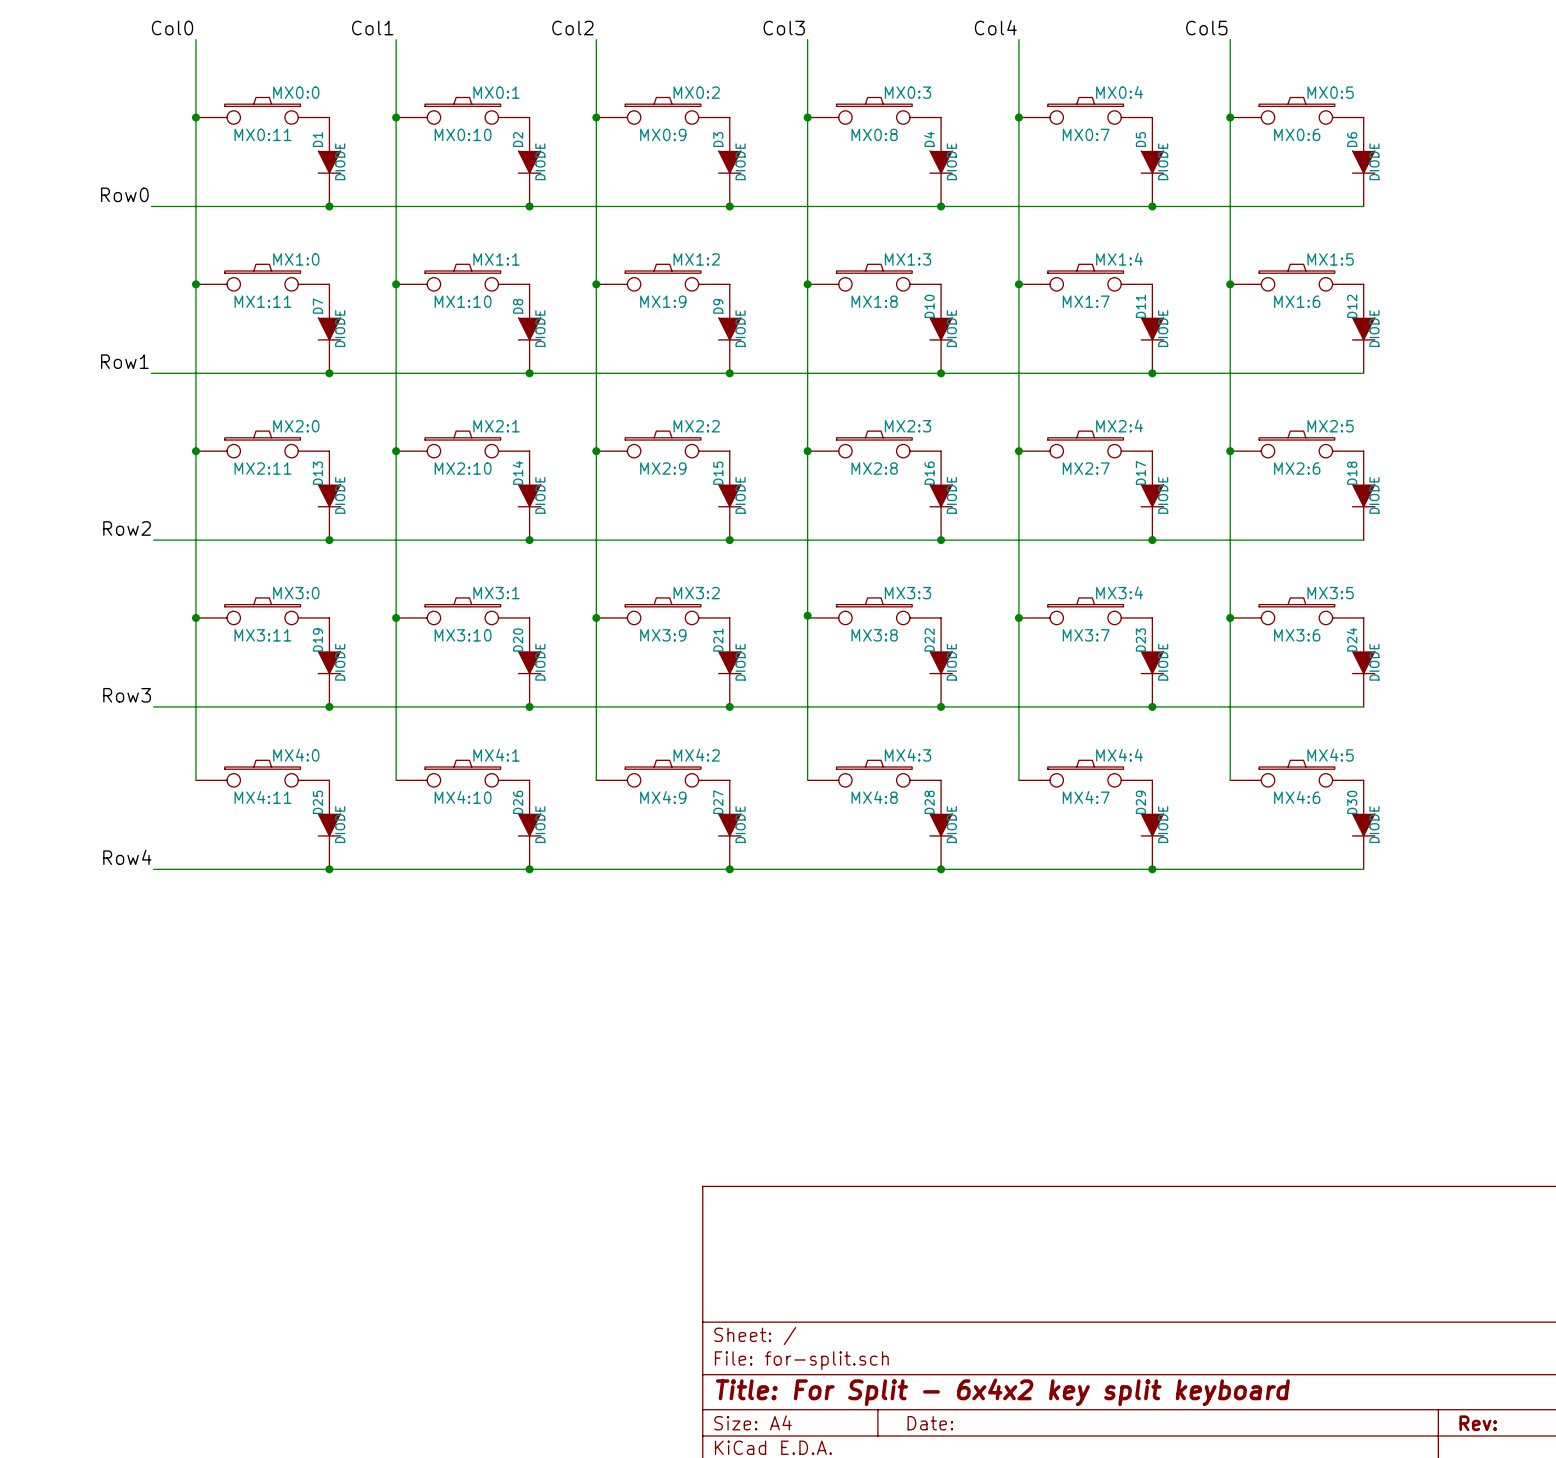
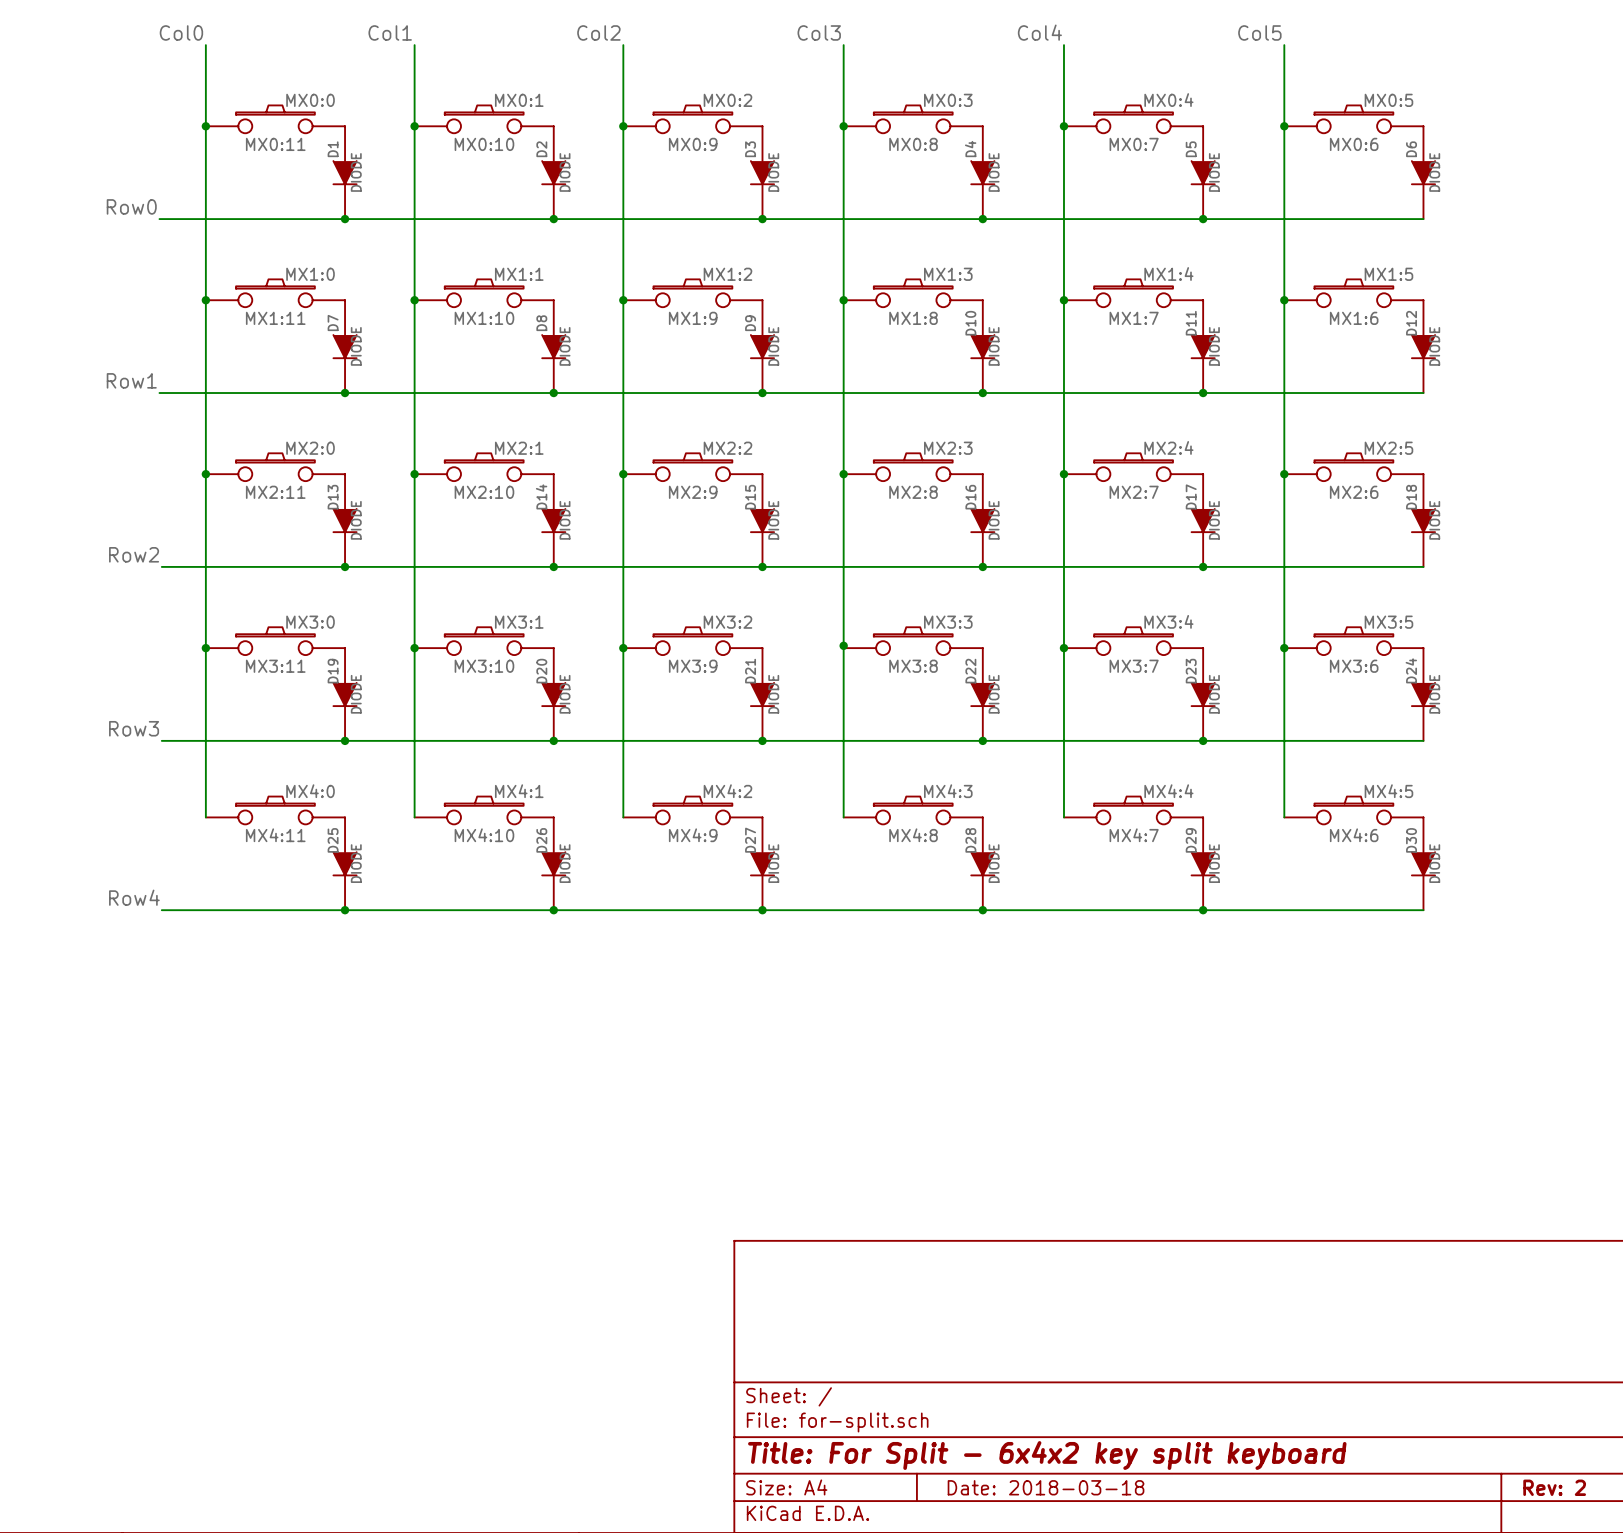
title block: Date: (930, 1423) -> Date: 2018-03-18 (1046, 1487)
title block: Rev: (1478, 1423) -> Rev: 2 (1554, 1487)

